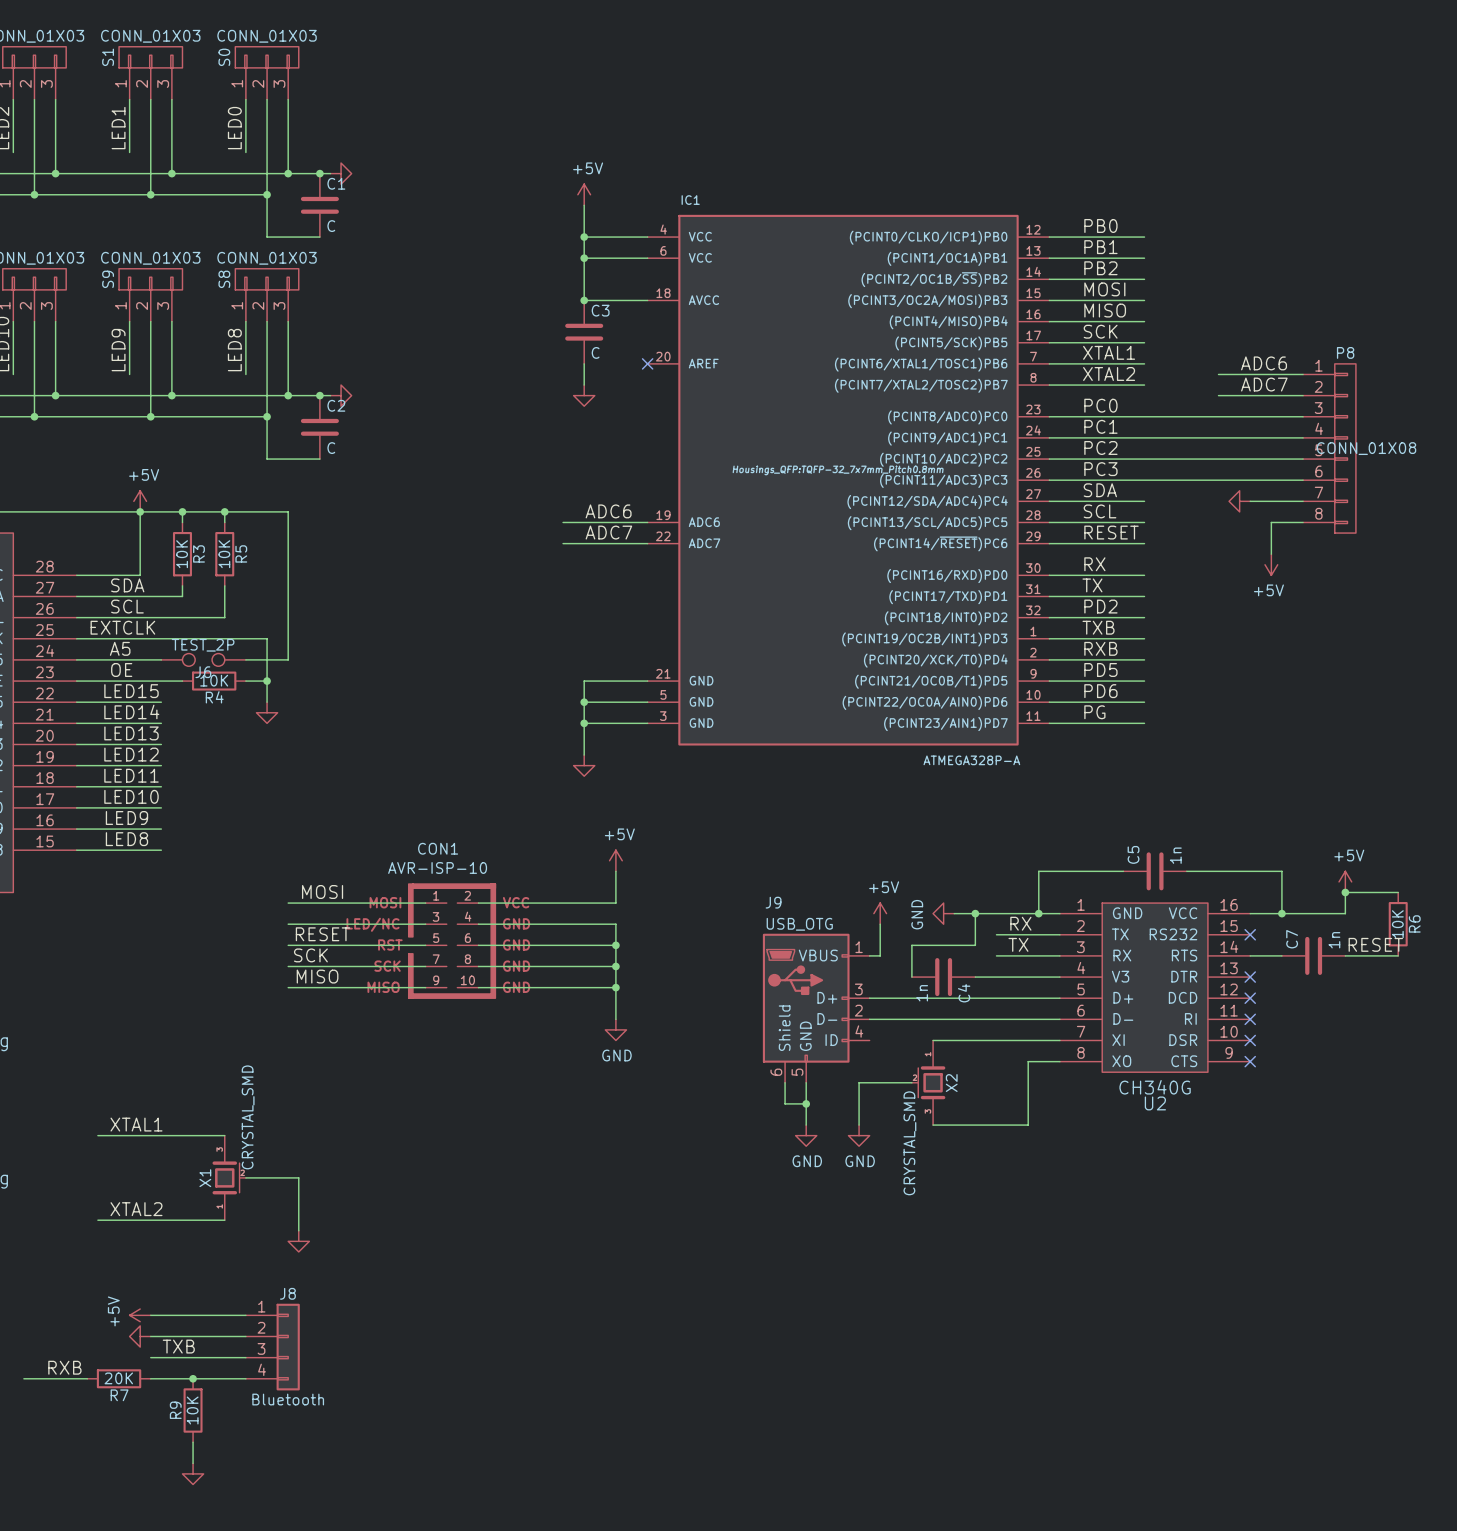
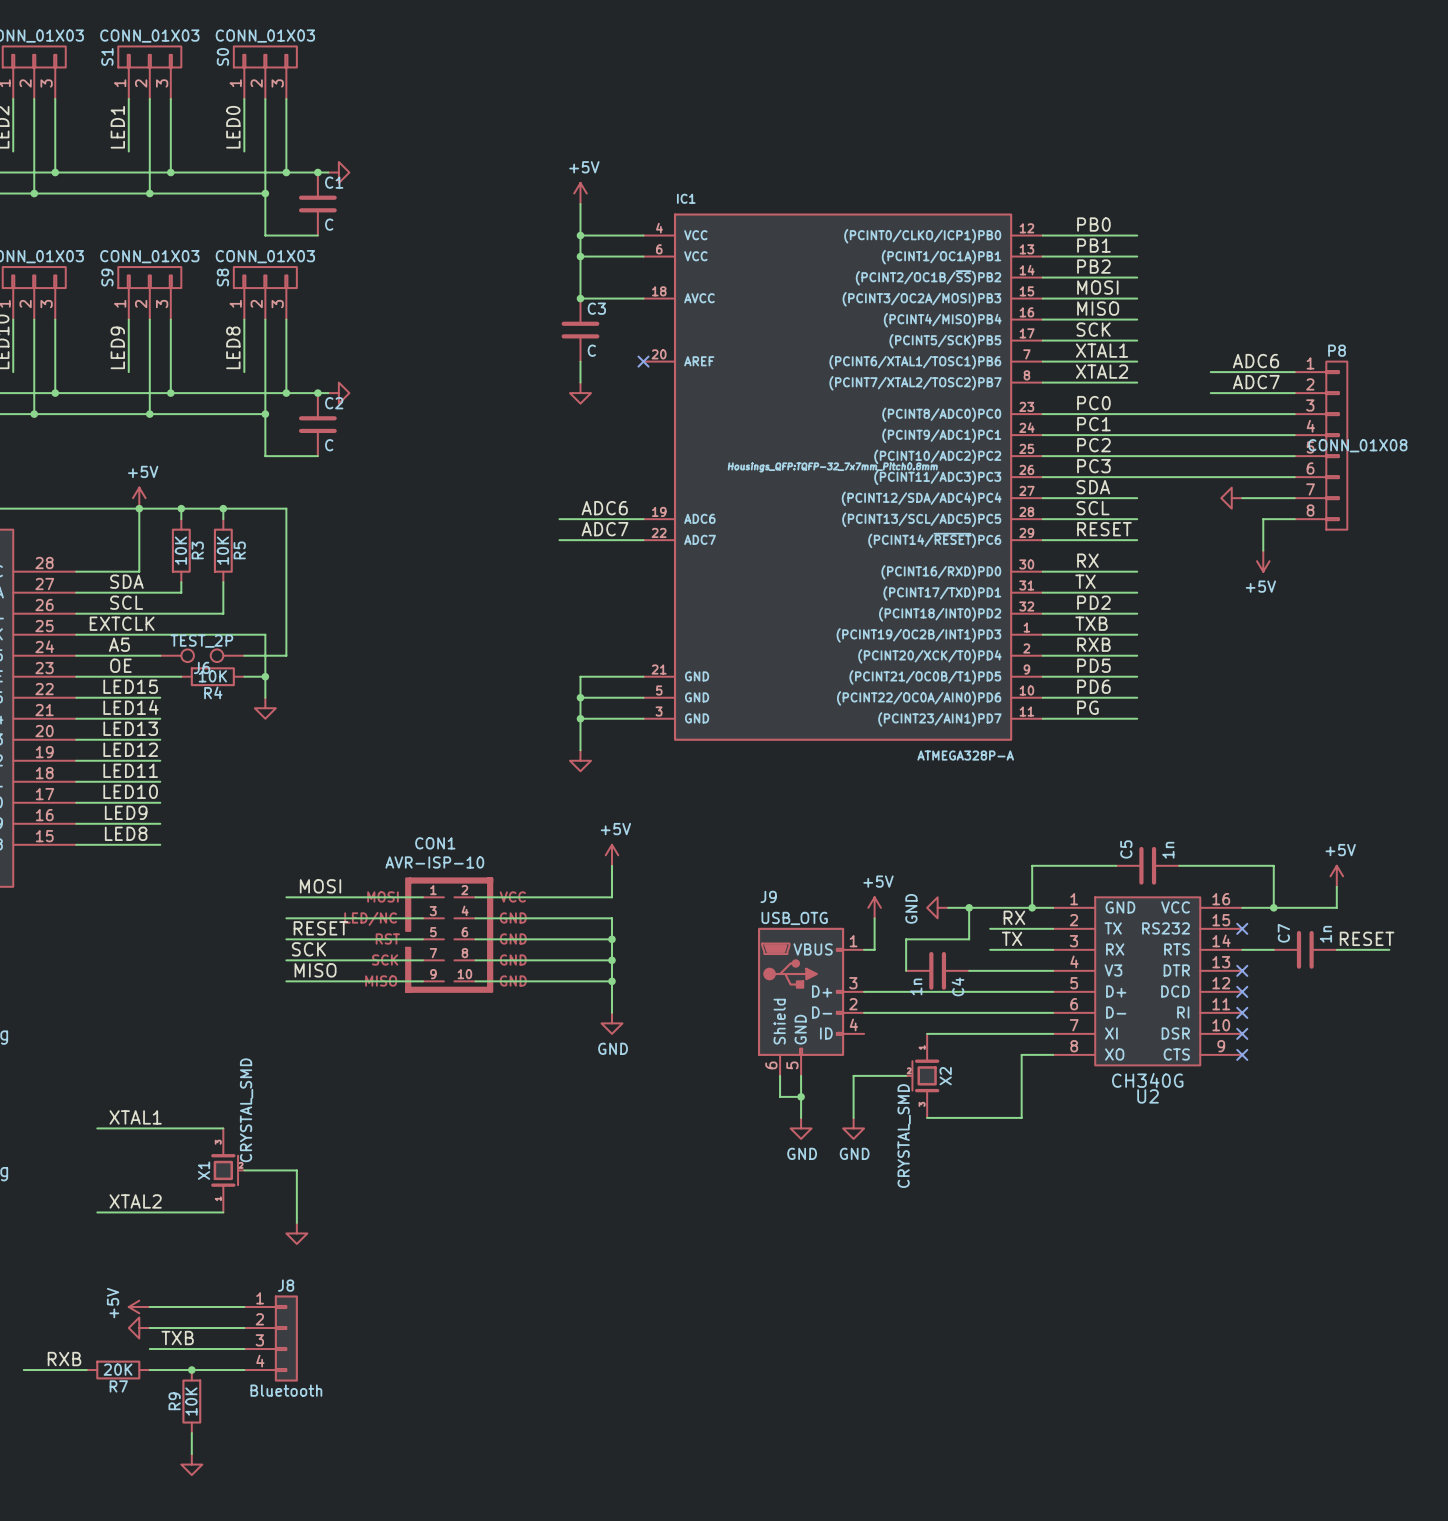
wire: (1345, 892) (1398, 892) -> none
junction: (1345, 892) -> none
R6: 10K (1398, 924) -> none

